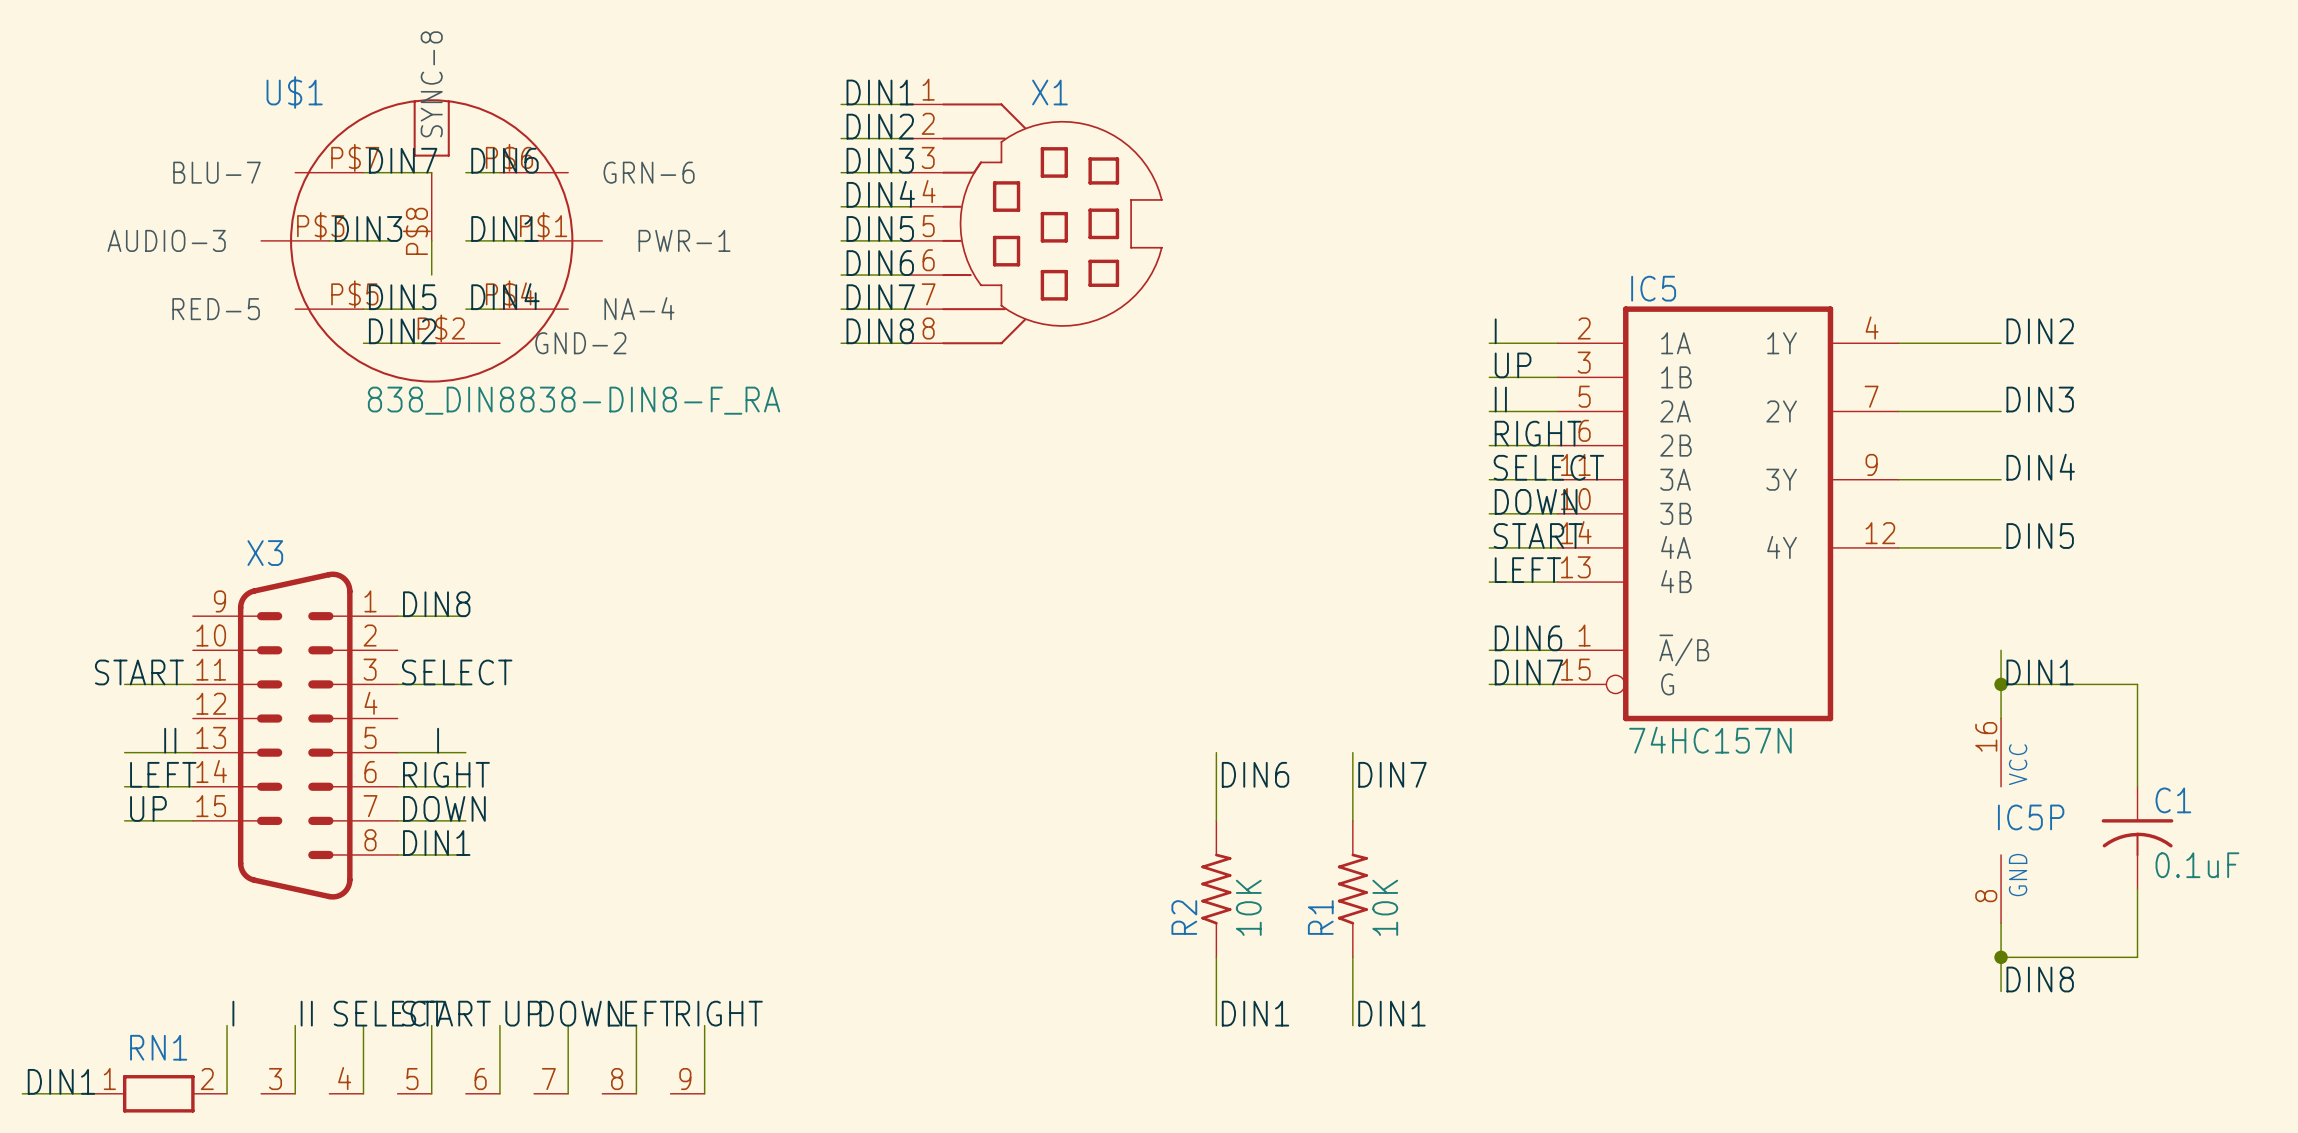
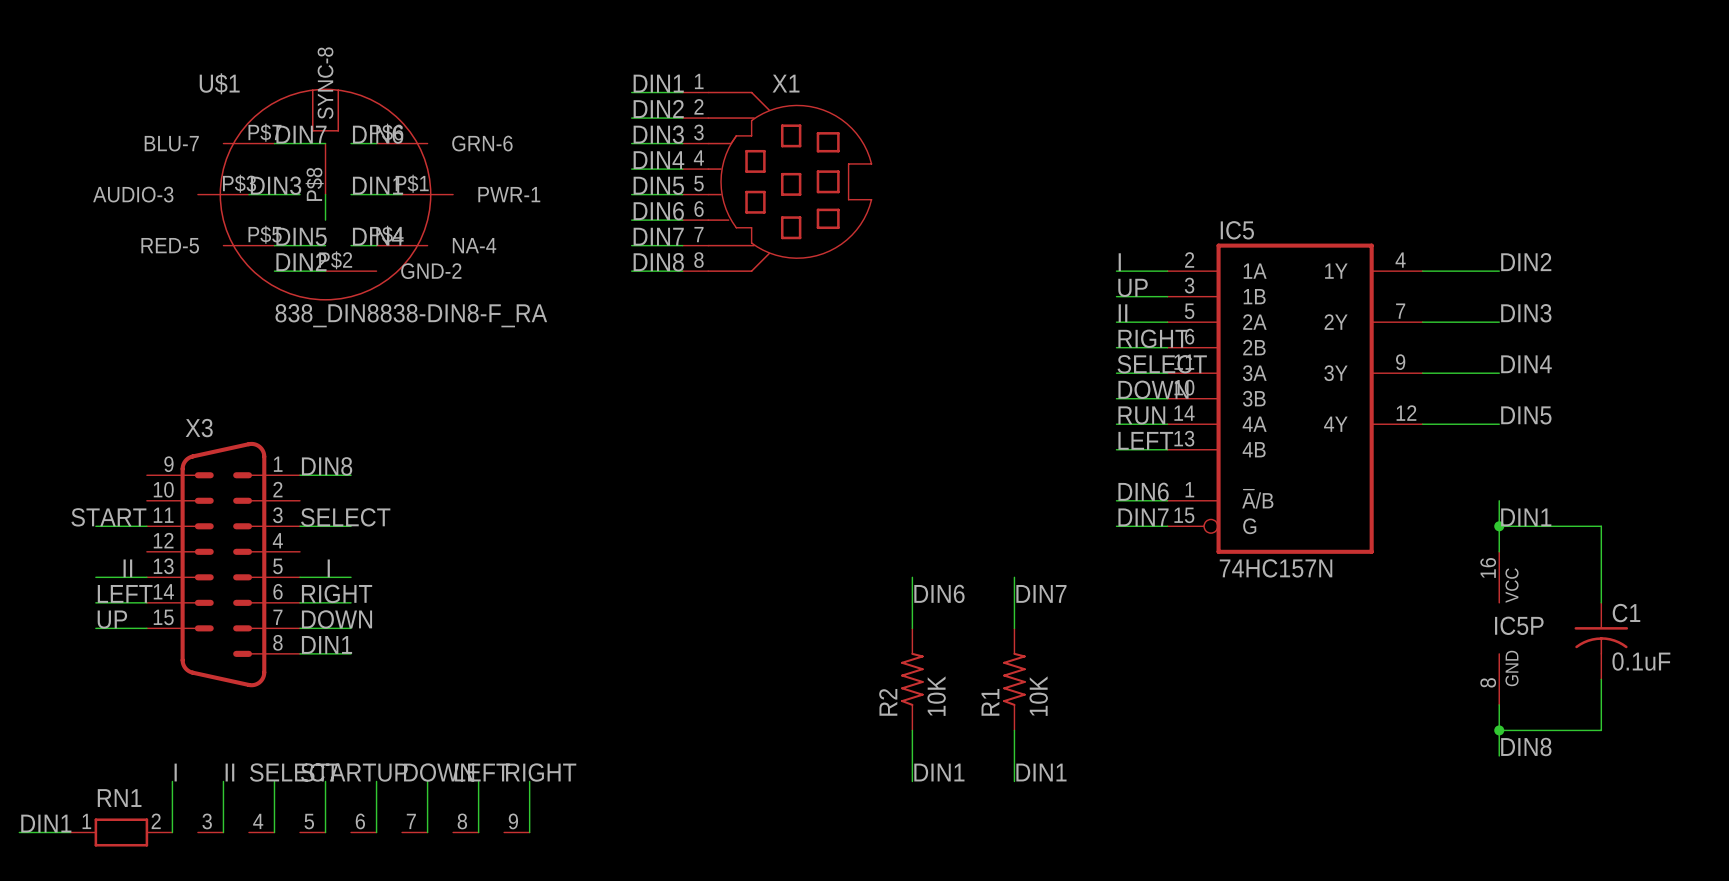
label: START (1538, 536) -> RUN (1141, 415)

